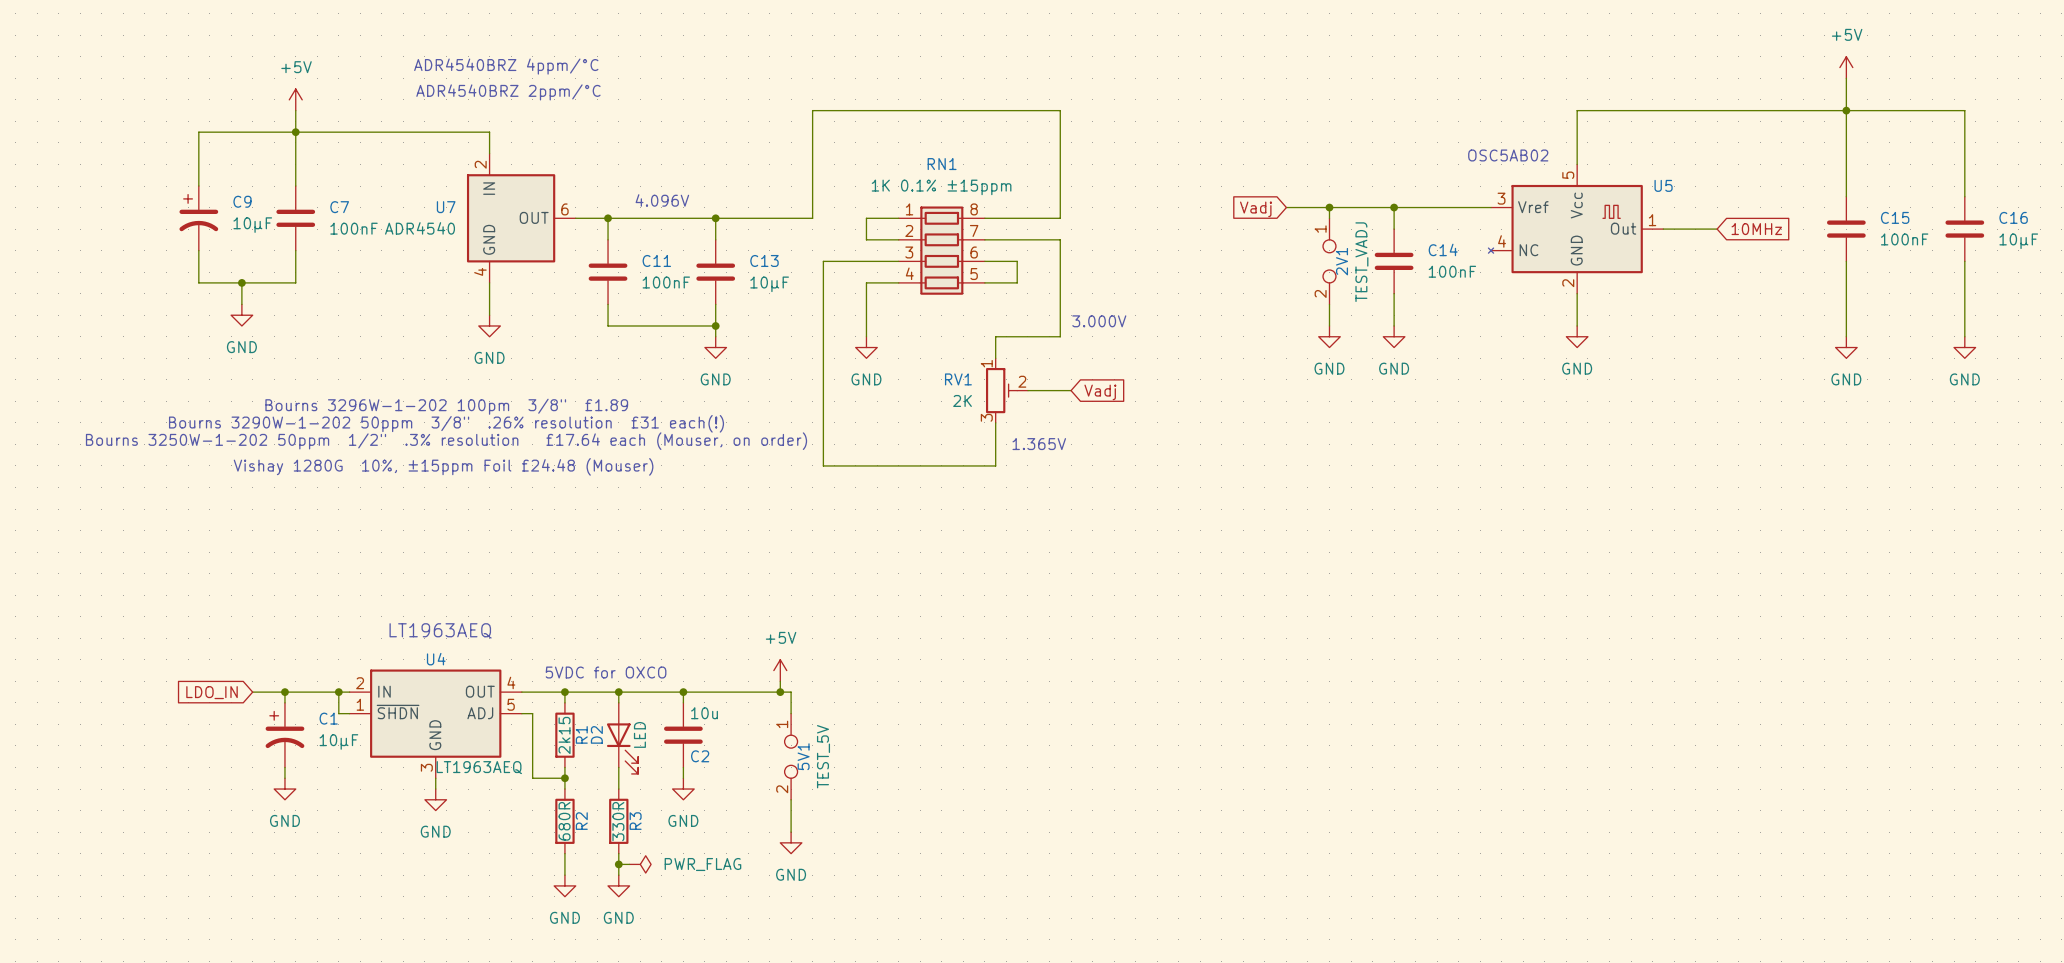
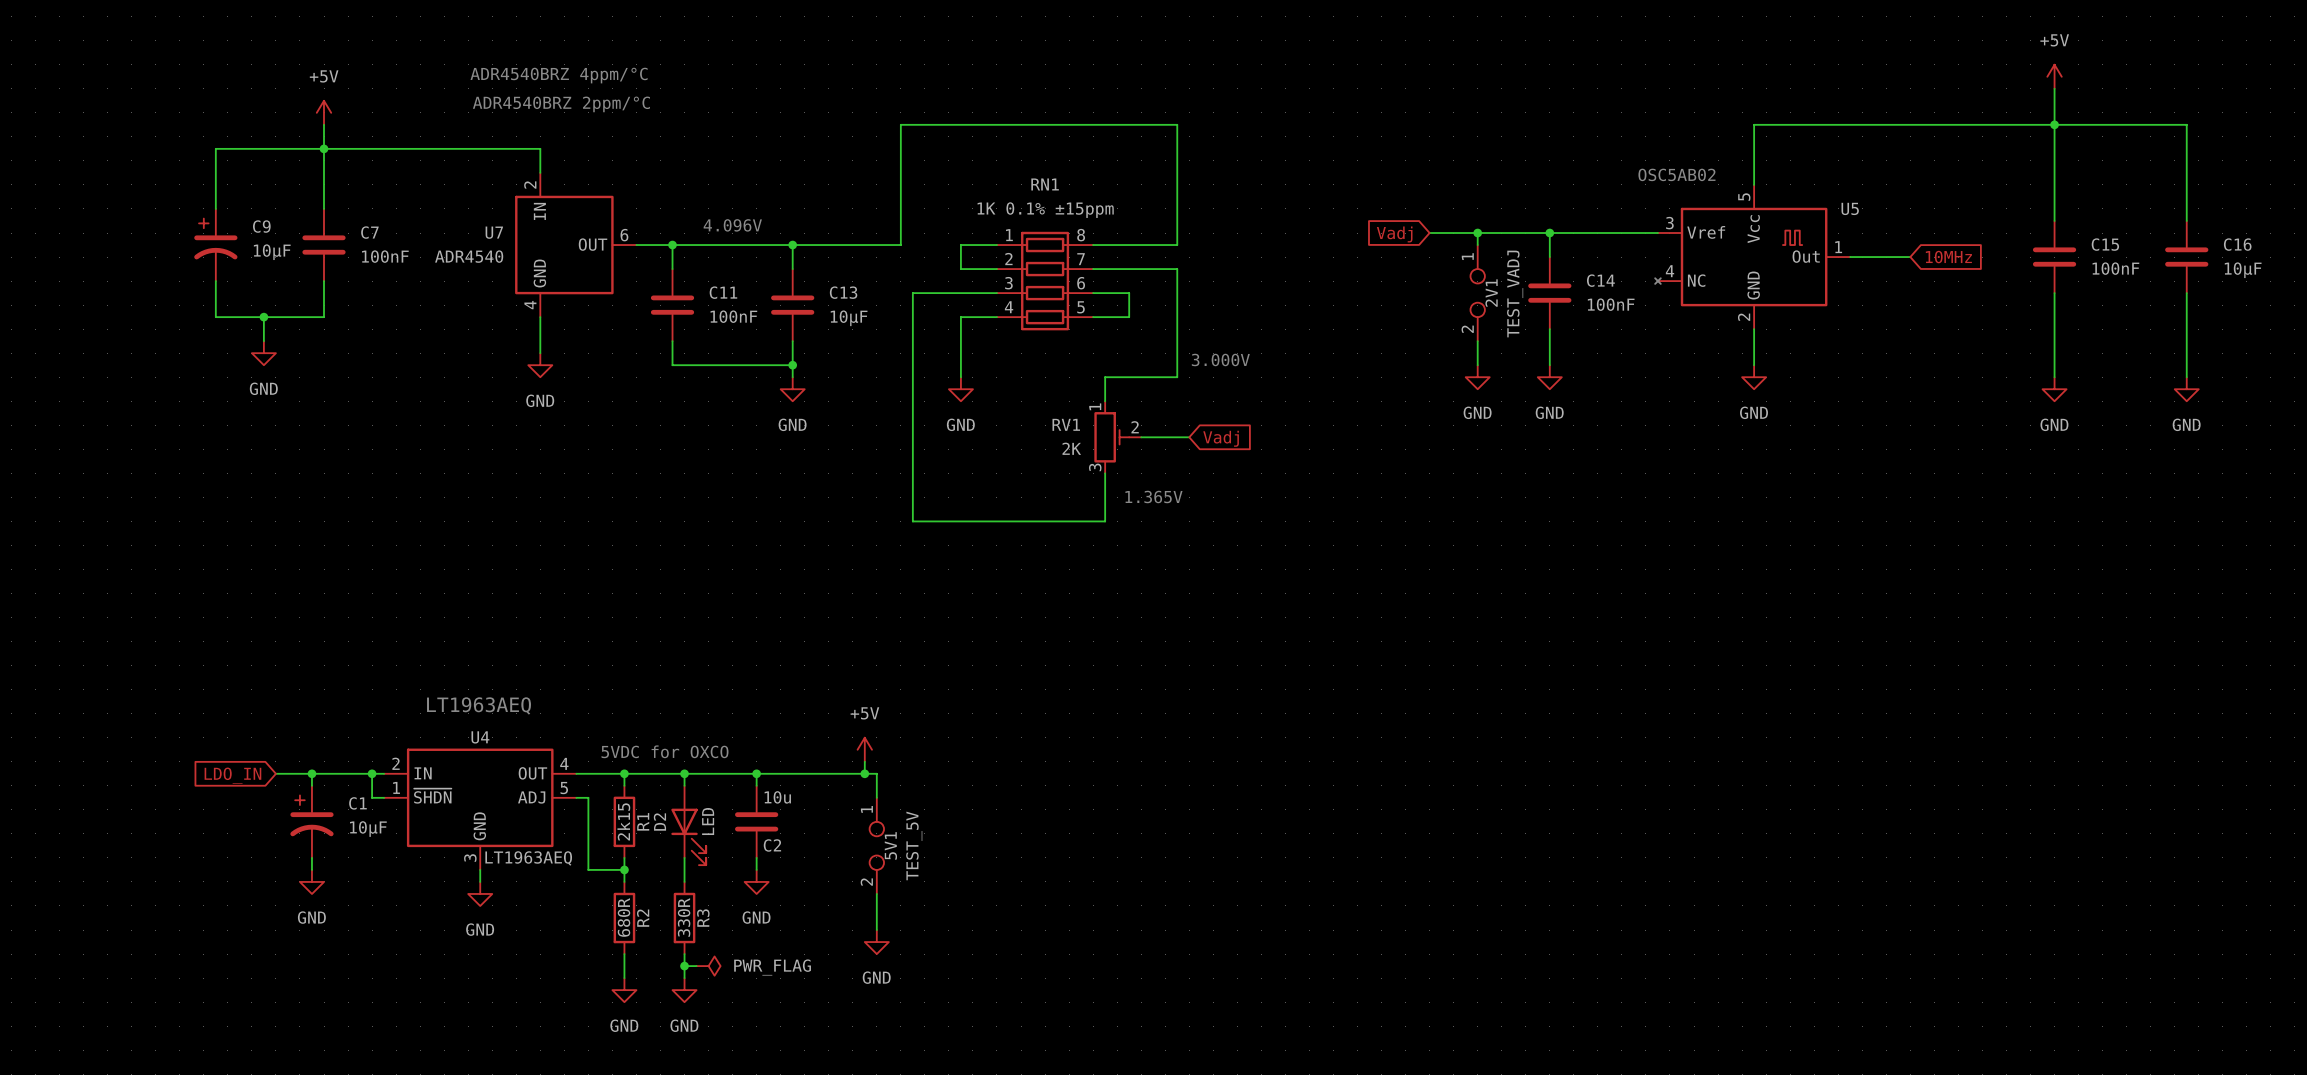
text: Bourns 3296W-1-202 100pm 3/8" £1.89 (446, 406) -> none
text: Bourns 3290W-1-202 50ppm 3/8" .26% resolution £31 each(!) (446, 423) -> none
text: Bourns 3250W-1-202 50ppm 1/2" .3% resolution £17.64 each (Mouser, on order) (446, 441) -> none
text: Vishay 1280G 10%, ±15ppm Foil £24.48 (Mouser) (443, 466) -> none

